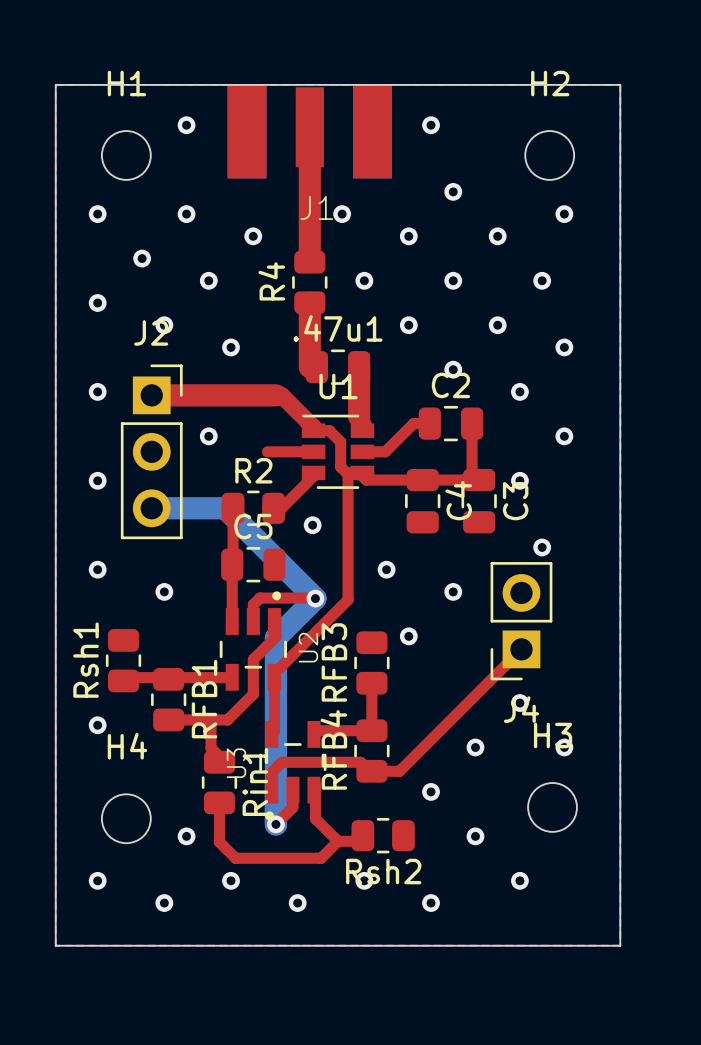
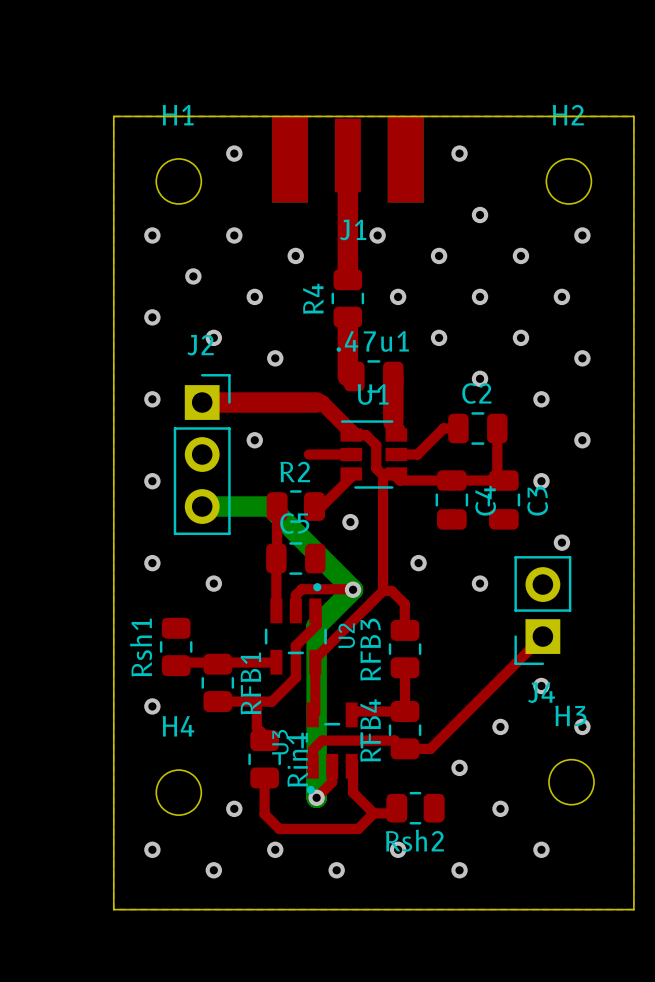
top track: none -> (383, 590) (391, 590) (404, 604) (404, 631)
via: (408, 636) -> none

